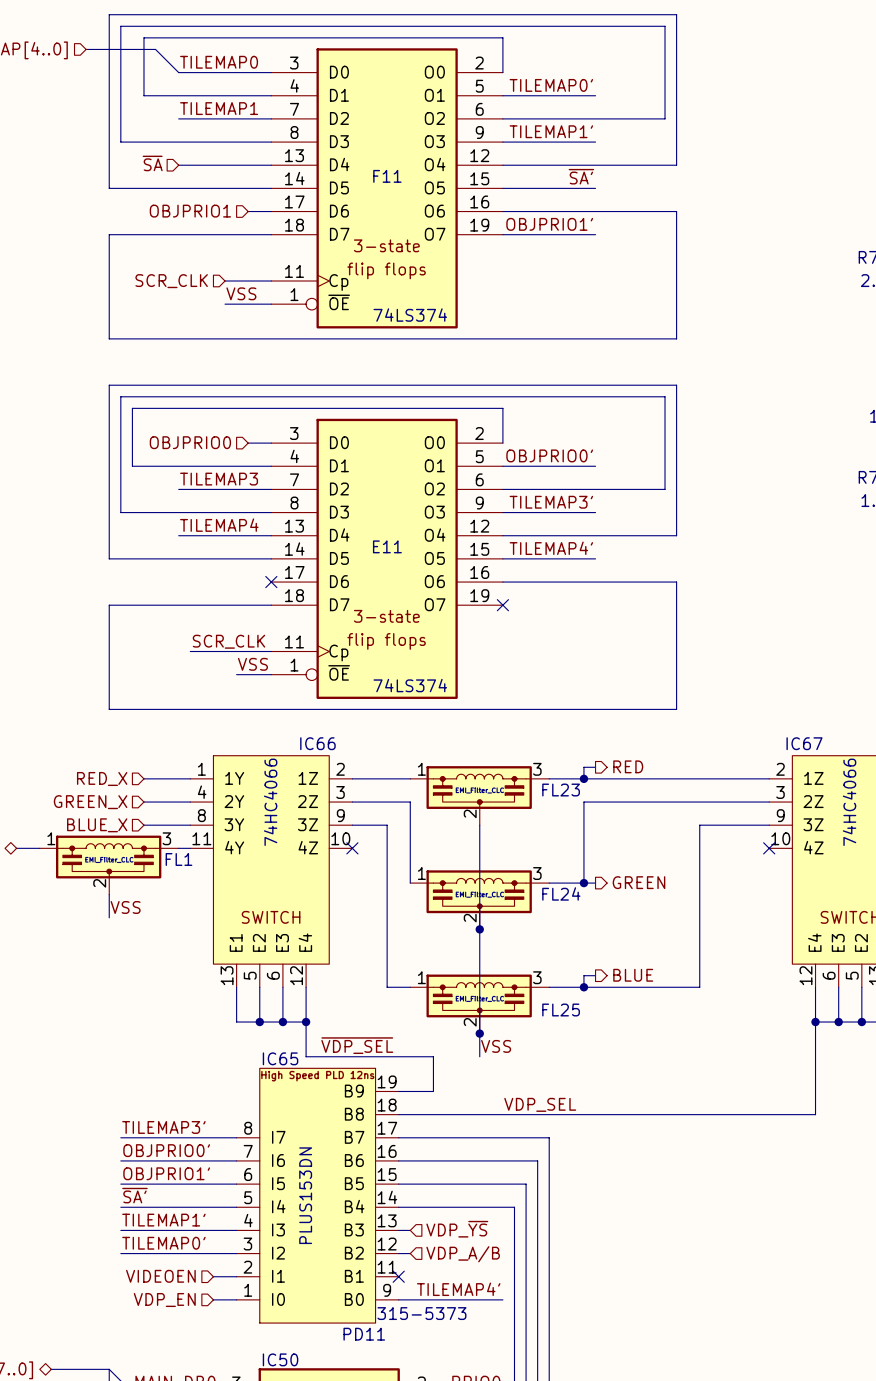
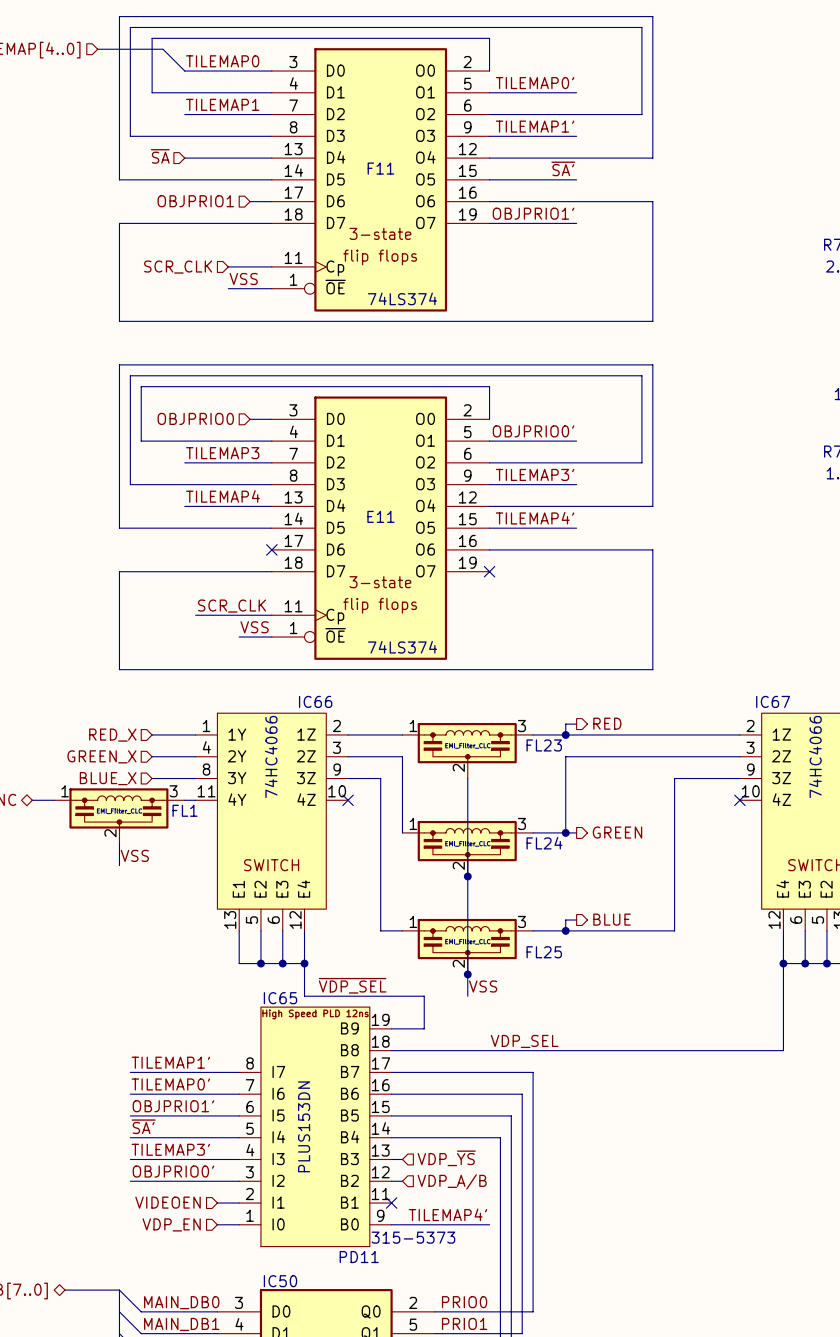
label: TILEMAP3' (163, 1127) -> TILEMAP1' (170, 1062)
label: OBJPRIO0' (166, 1150) -> TILEMAP0' (170, 1084)
label: TILEMAP1' (163, 1220) -> TILEMAP3' (170, 1149)
label: TILEMAP0' (163, 1243) -> OBJPRIO0' (173, 1171)

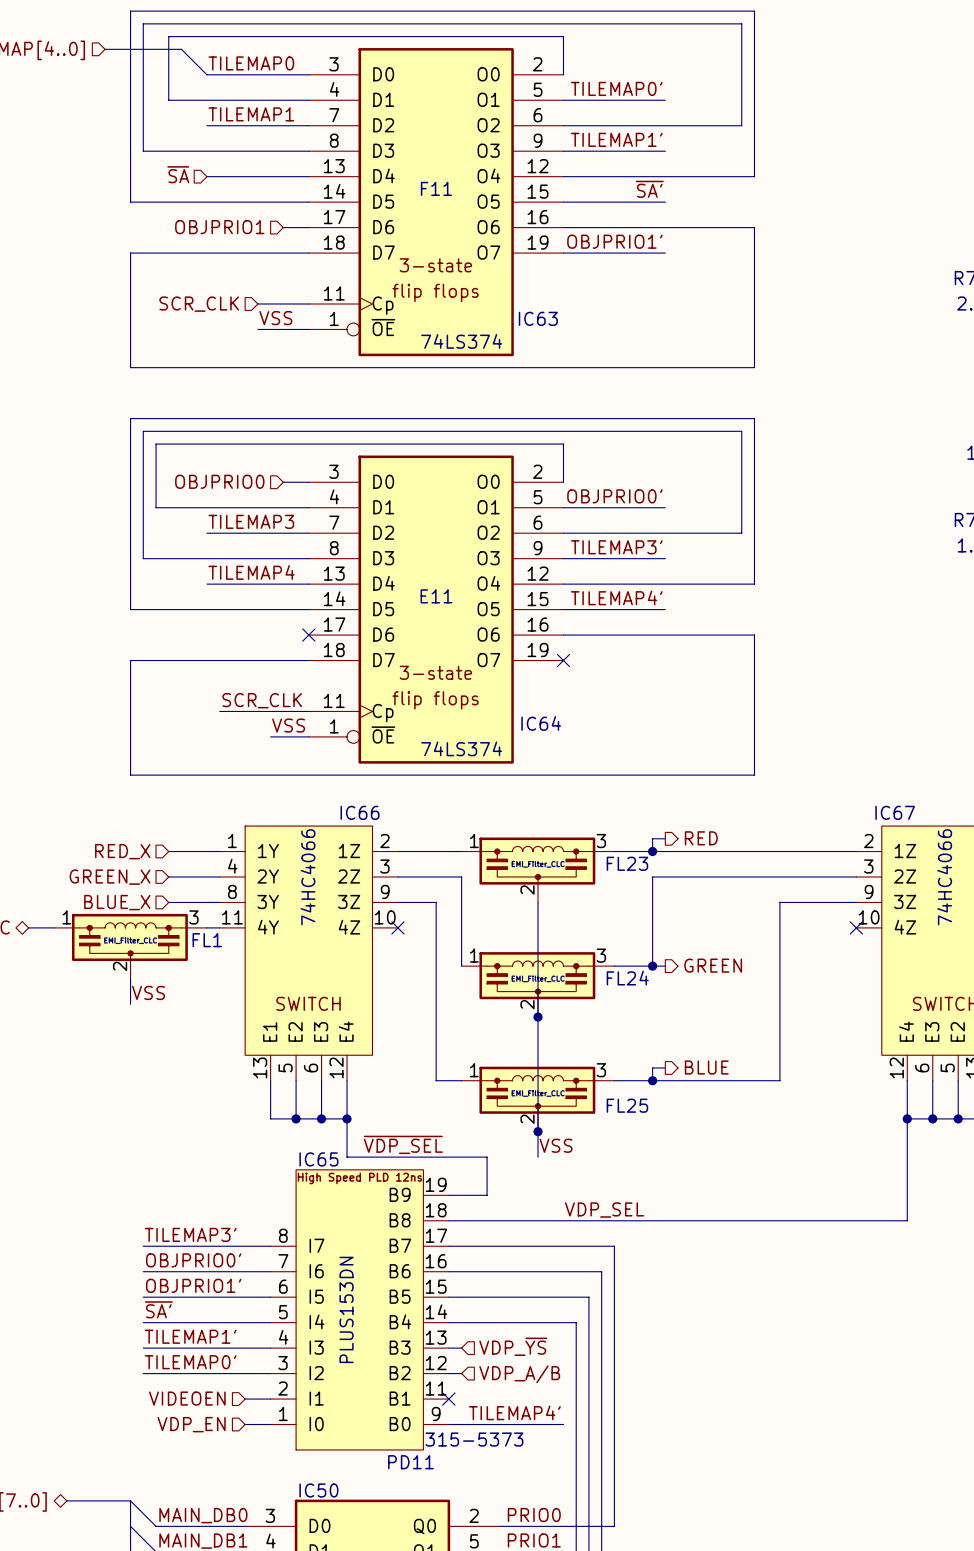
text: none -> IC63 (538, 318)
text: none -> IC64 (541, 723)
label: TILEMAP1' (170, 1062) -> TILEMAP3' (190, 1234)
label: TILEMAP0' (170, 1084) -> OBJPRIO0' (193, 1260)
label: TILEMAP3' (170, 1149) -> TILEMAP1' (190, 1336)
label: OBJPRIO0' (173, 1171) -> TILEMAP0' (190, 1362)

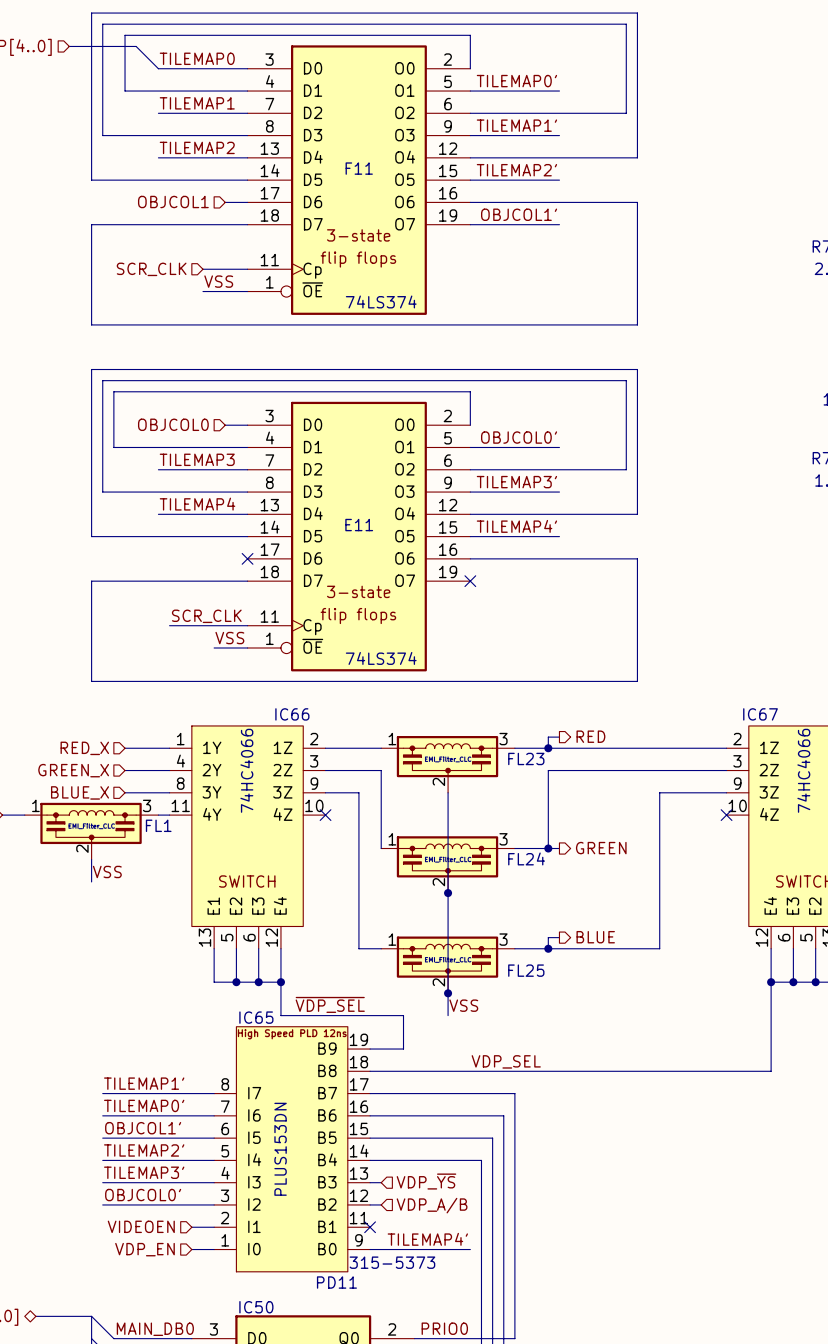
label: none -> TILEMAP2 (197, 147)
hierarchical label: ~{SA} (178, 174) -> none
label: ~{SA'} (649, 189) -> TILEMAP2' (516, 170)
hierarchical label: OBJPRIO1 (219, 227) -> OBJCOL1 (173, 201)
label: OBJPRIO1' (614, 241) -> OBJCOL1' (519, 214)
text: IC63 (538, 318) -> none
hierarchical label: OBJPRIO0 (219, 481) -> OBJCOL0 (173, 424)
label: OBJPRIO0' (614, 496) -> OBJCOL0' (519, 437)
text: IC64 (541, 723) -> none
label: TILEMAP3' (190, 1234) -> TILEMAP1' (144, 1083)
label: OBJPRIO0' (193, 1260) -> TILEMAP0' (144, 1105)
label: OBJPRIO1' (193, 1285) -> OBJCOL1' (143, 1128)
label: ~{SA'} (158, 1309) -> TILEMAP2' (144, 1150)
label: TILEMAP1' (190, 1336) -> TILEMAP3' (144, 1172)
label: TILEMAP0' (190, 1362) -> OBJCOL0' (143, 1195)

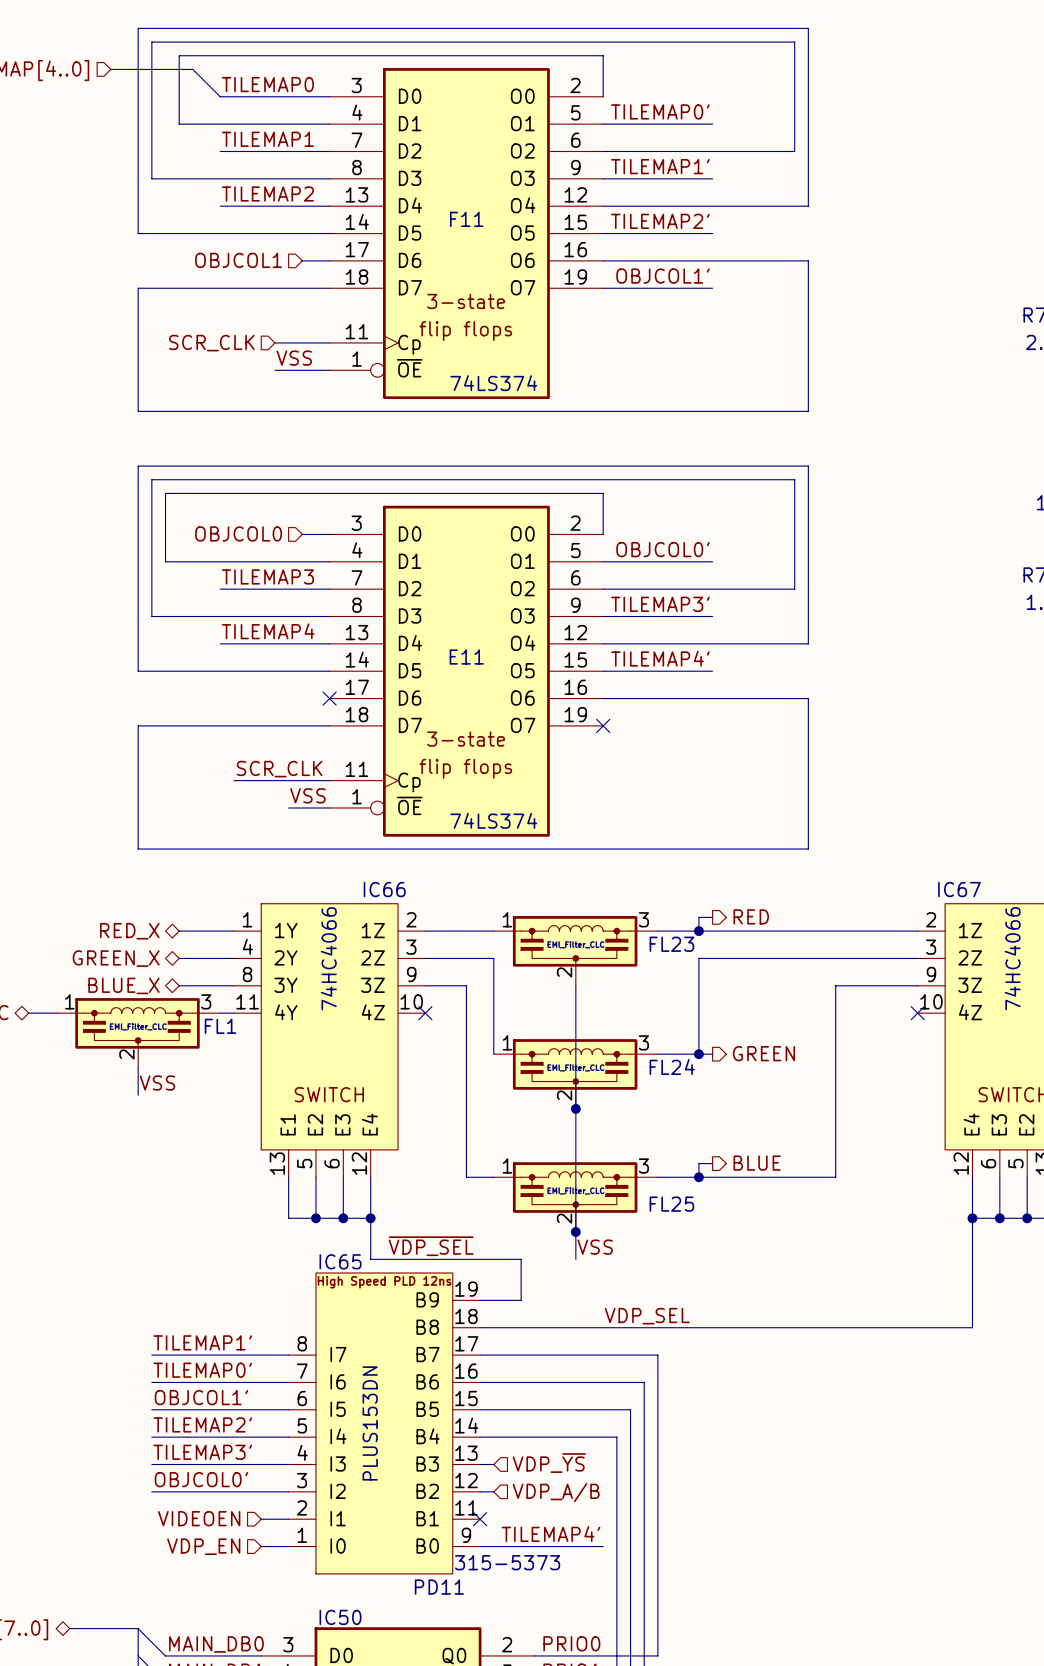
hierarchical label shape: input (84, 748) -> bidirectional (129, 931)
hierarchical label shape: input (73, 770) -> bidirectional (116, 958)
hierarchical label shape: input (80, 792) -> bidirectional (123, 985)

